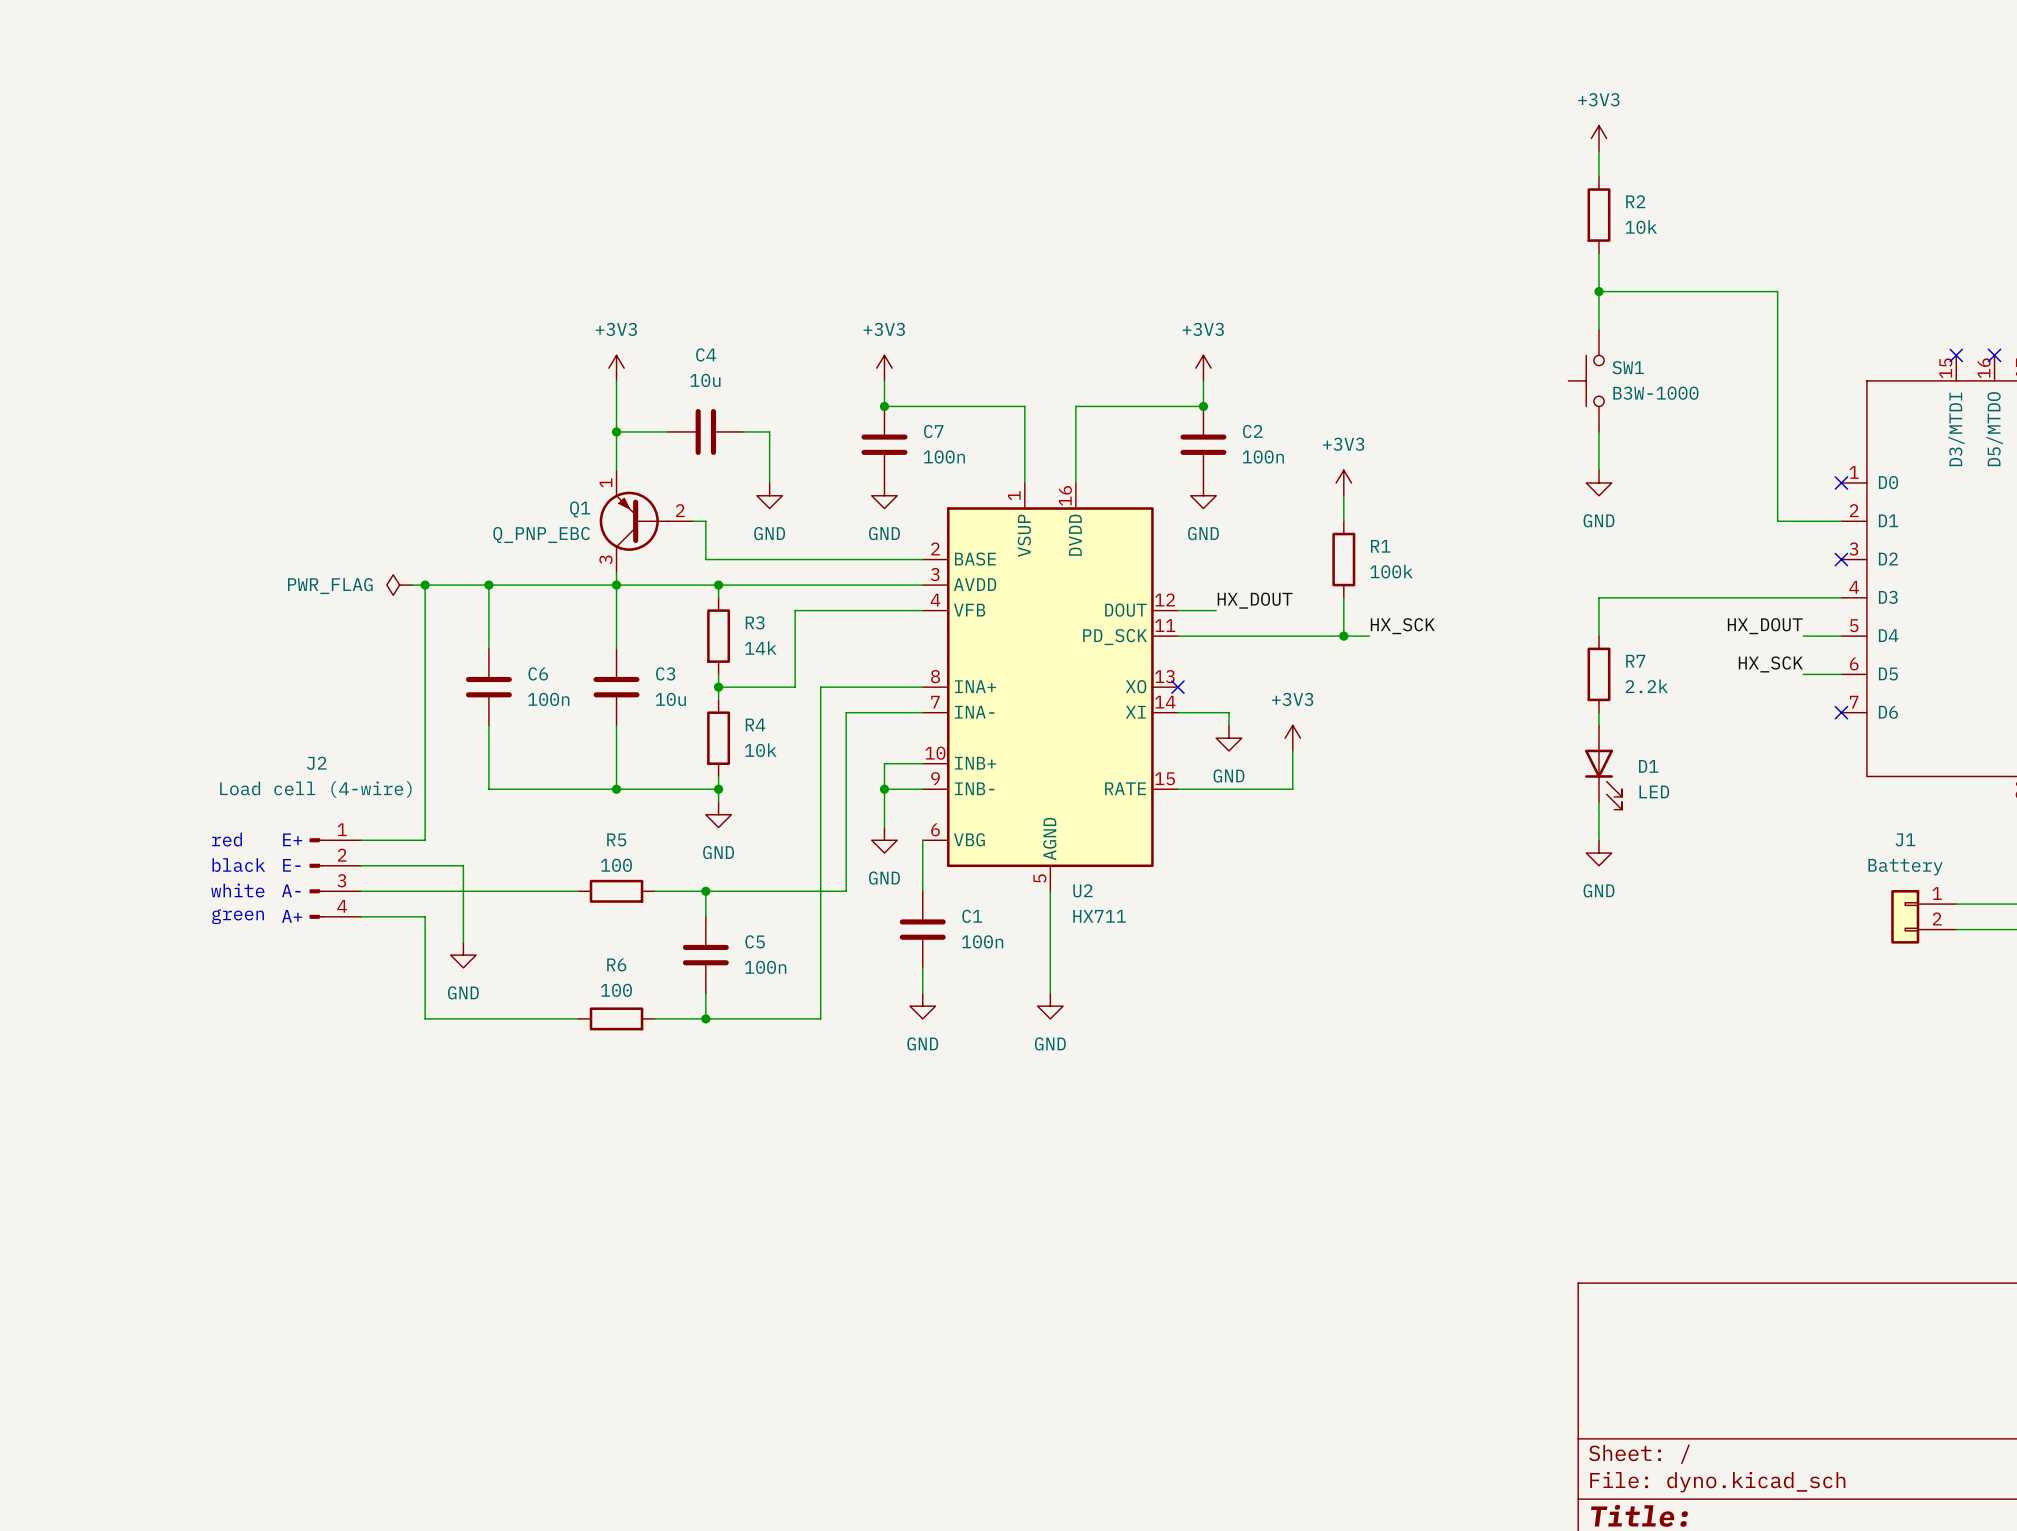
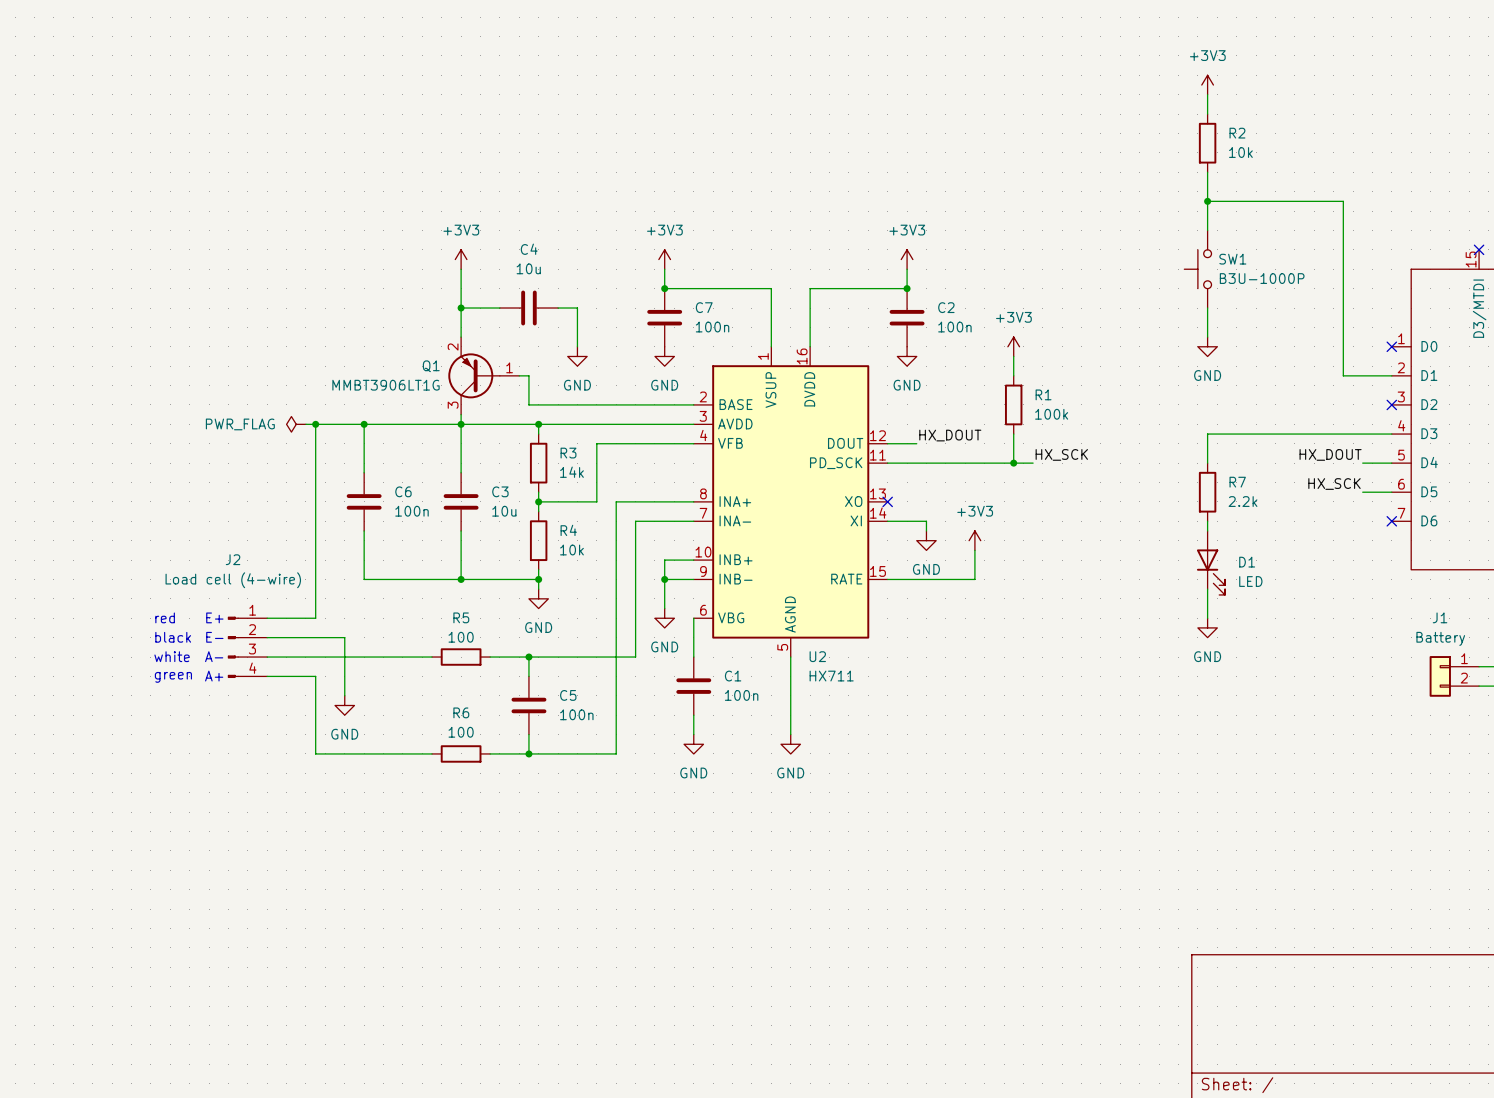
SW1 value: B3W-1000 (1655, 393) -> B3U-1000P (1262, 278)
Q1 pin number: 1 (605, 482) -> 2 (453, 347)
Q1 pin number: 2 (680, 510) -> 1 (509, 367)
Q1 value: Q_PNP_EBC (541, 535) -> MMBT3906LT1G (386, 385)

